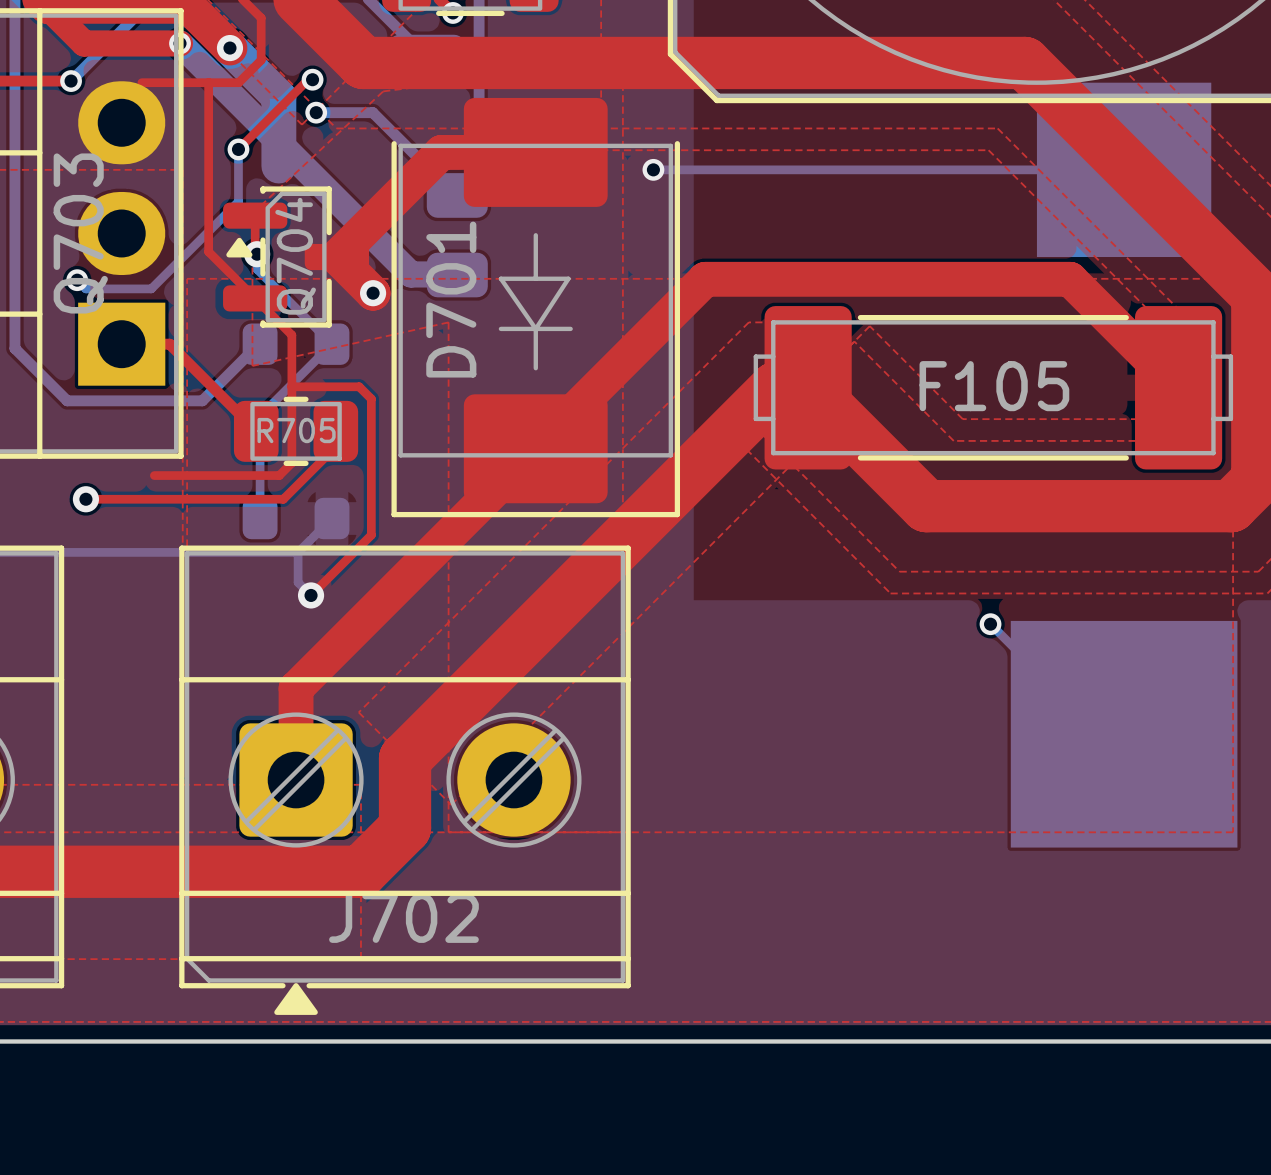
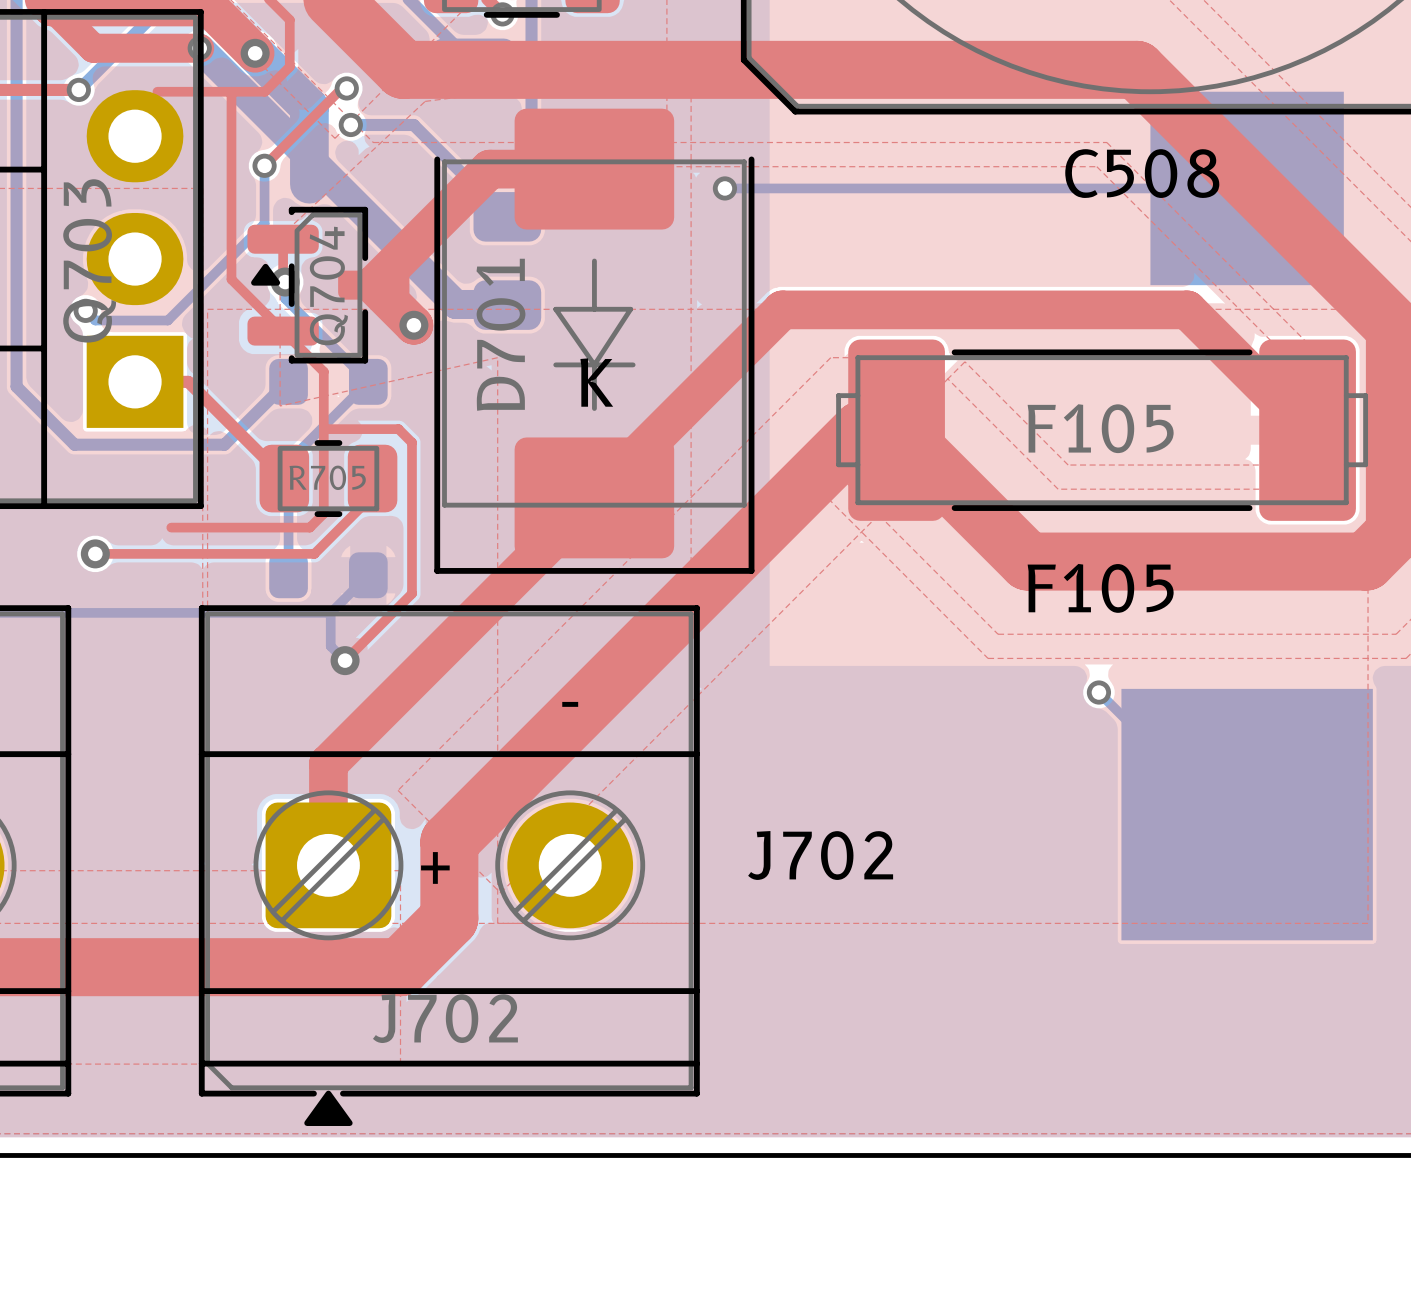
text: none -> C508 (1142, 173)
text: none -> K (596, 382)
text: none -> F105 (1100, 588)
text: none -> - (570, 704)
text: none -> J702 (820, 855)
text: none -> + (435, 867)

